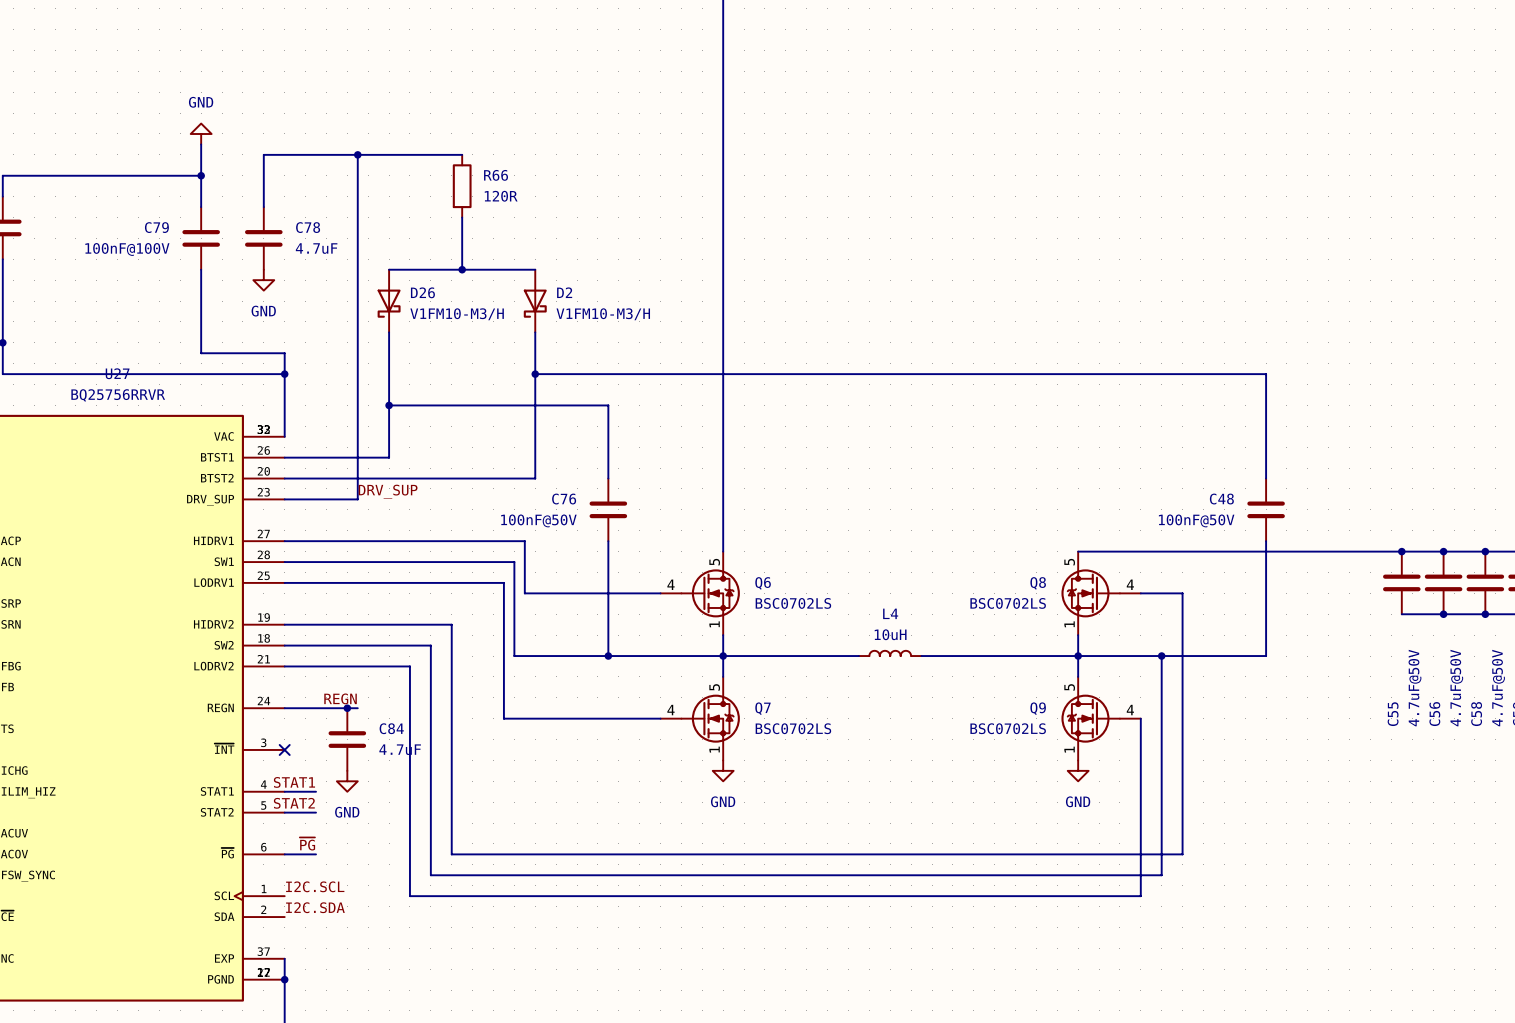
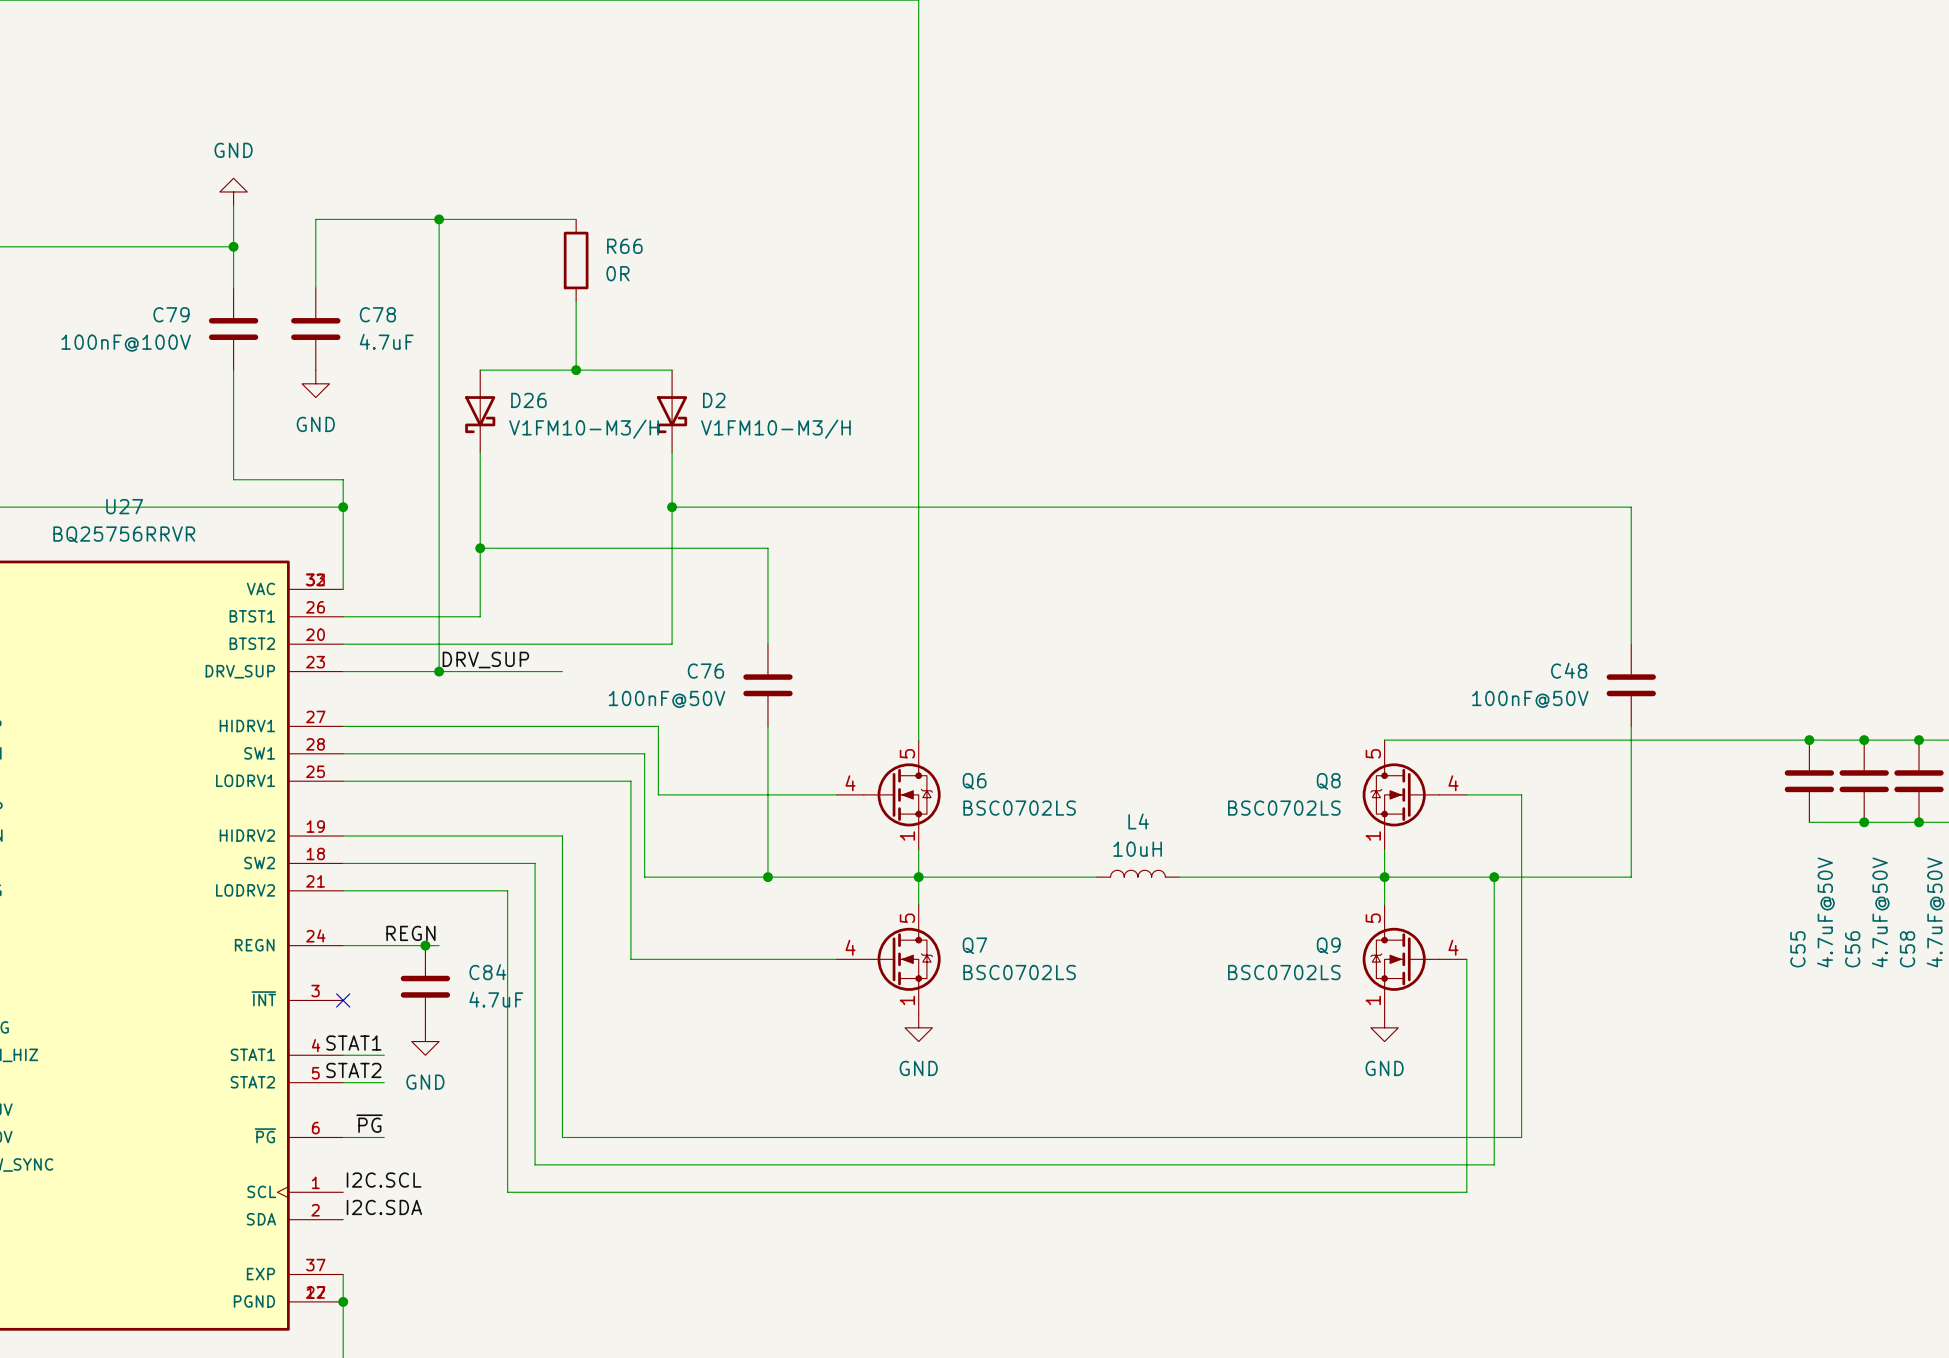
R66 value: 120R (501, 196) -> 0R (618, 273)
wire: none -> (439, 671) (562, 671)
junction: none -> (439, 671)

